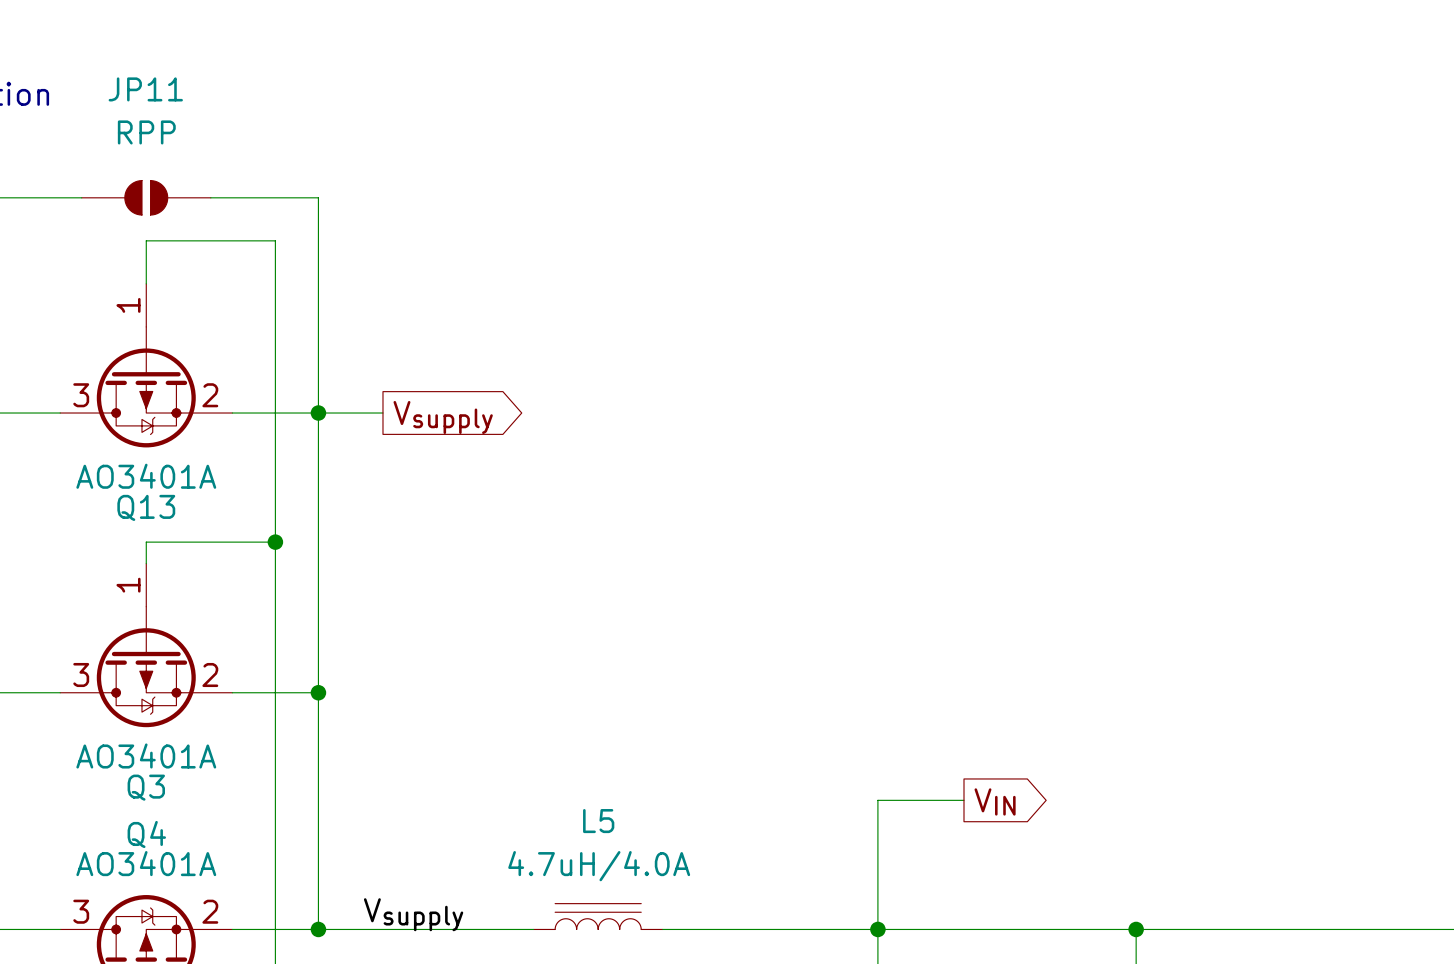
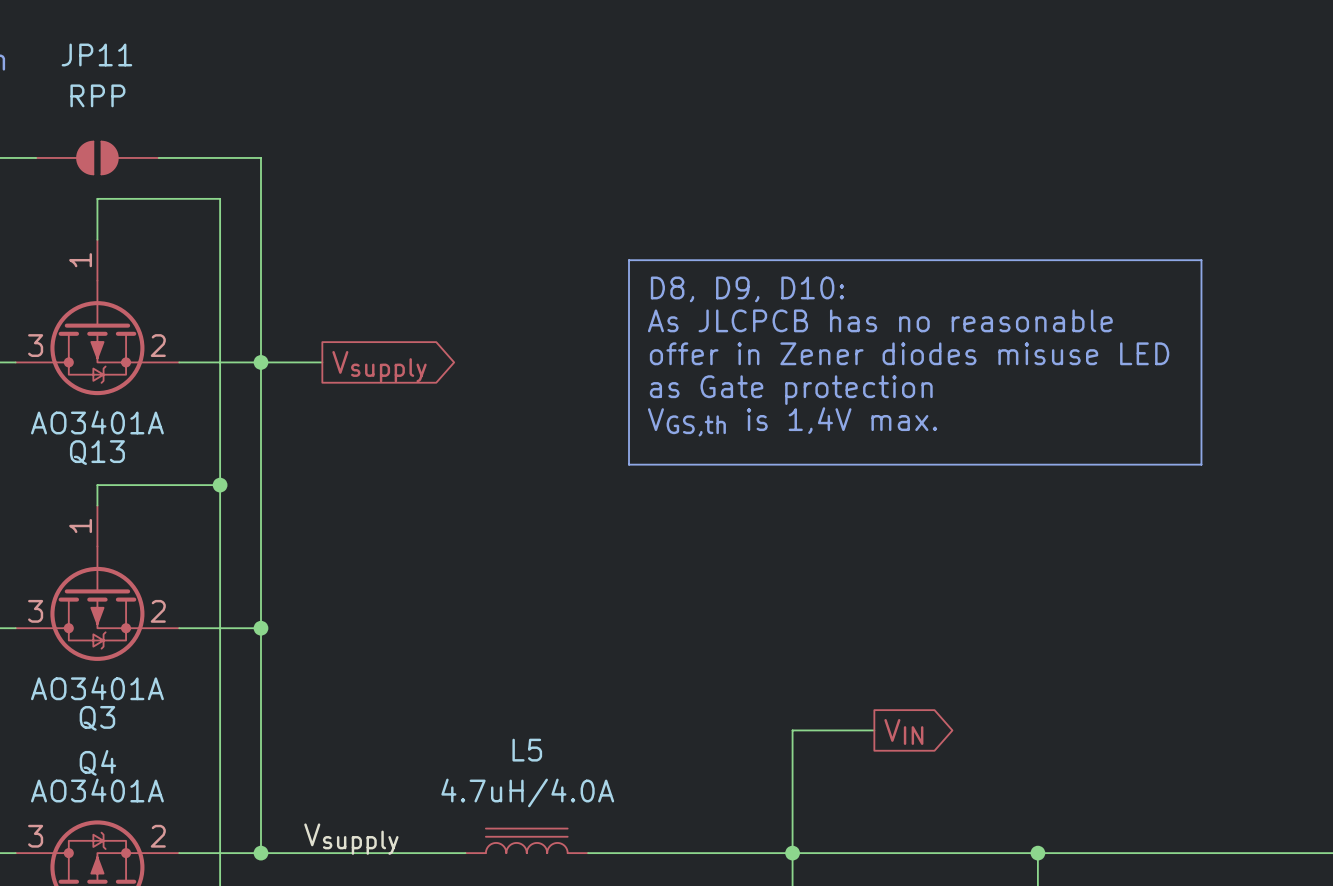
line: none -> (629, 260) (1201, 260) (1201, 464) (629, 464) (629, 260)
text: none -> D8, D9, D10: (747, 289)
text: none -> As JLCPCB has no reasonable (880, 320)
text: none -> offer in Zener diodes misuse LED (909, 353)
text: none -> as Gate protection (791, 390)
text: none -> VGS,th is 1,4V max. (792, 421)

